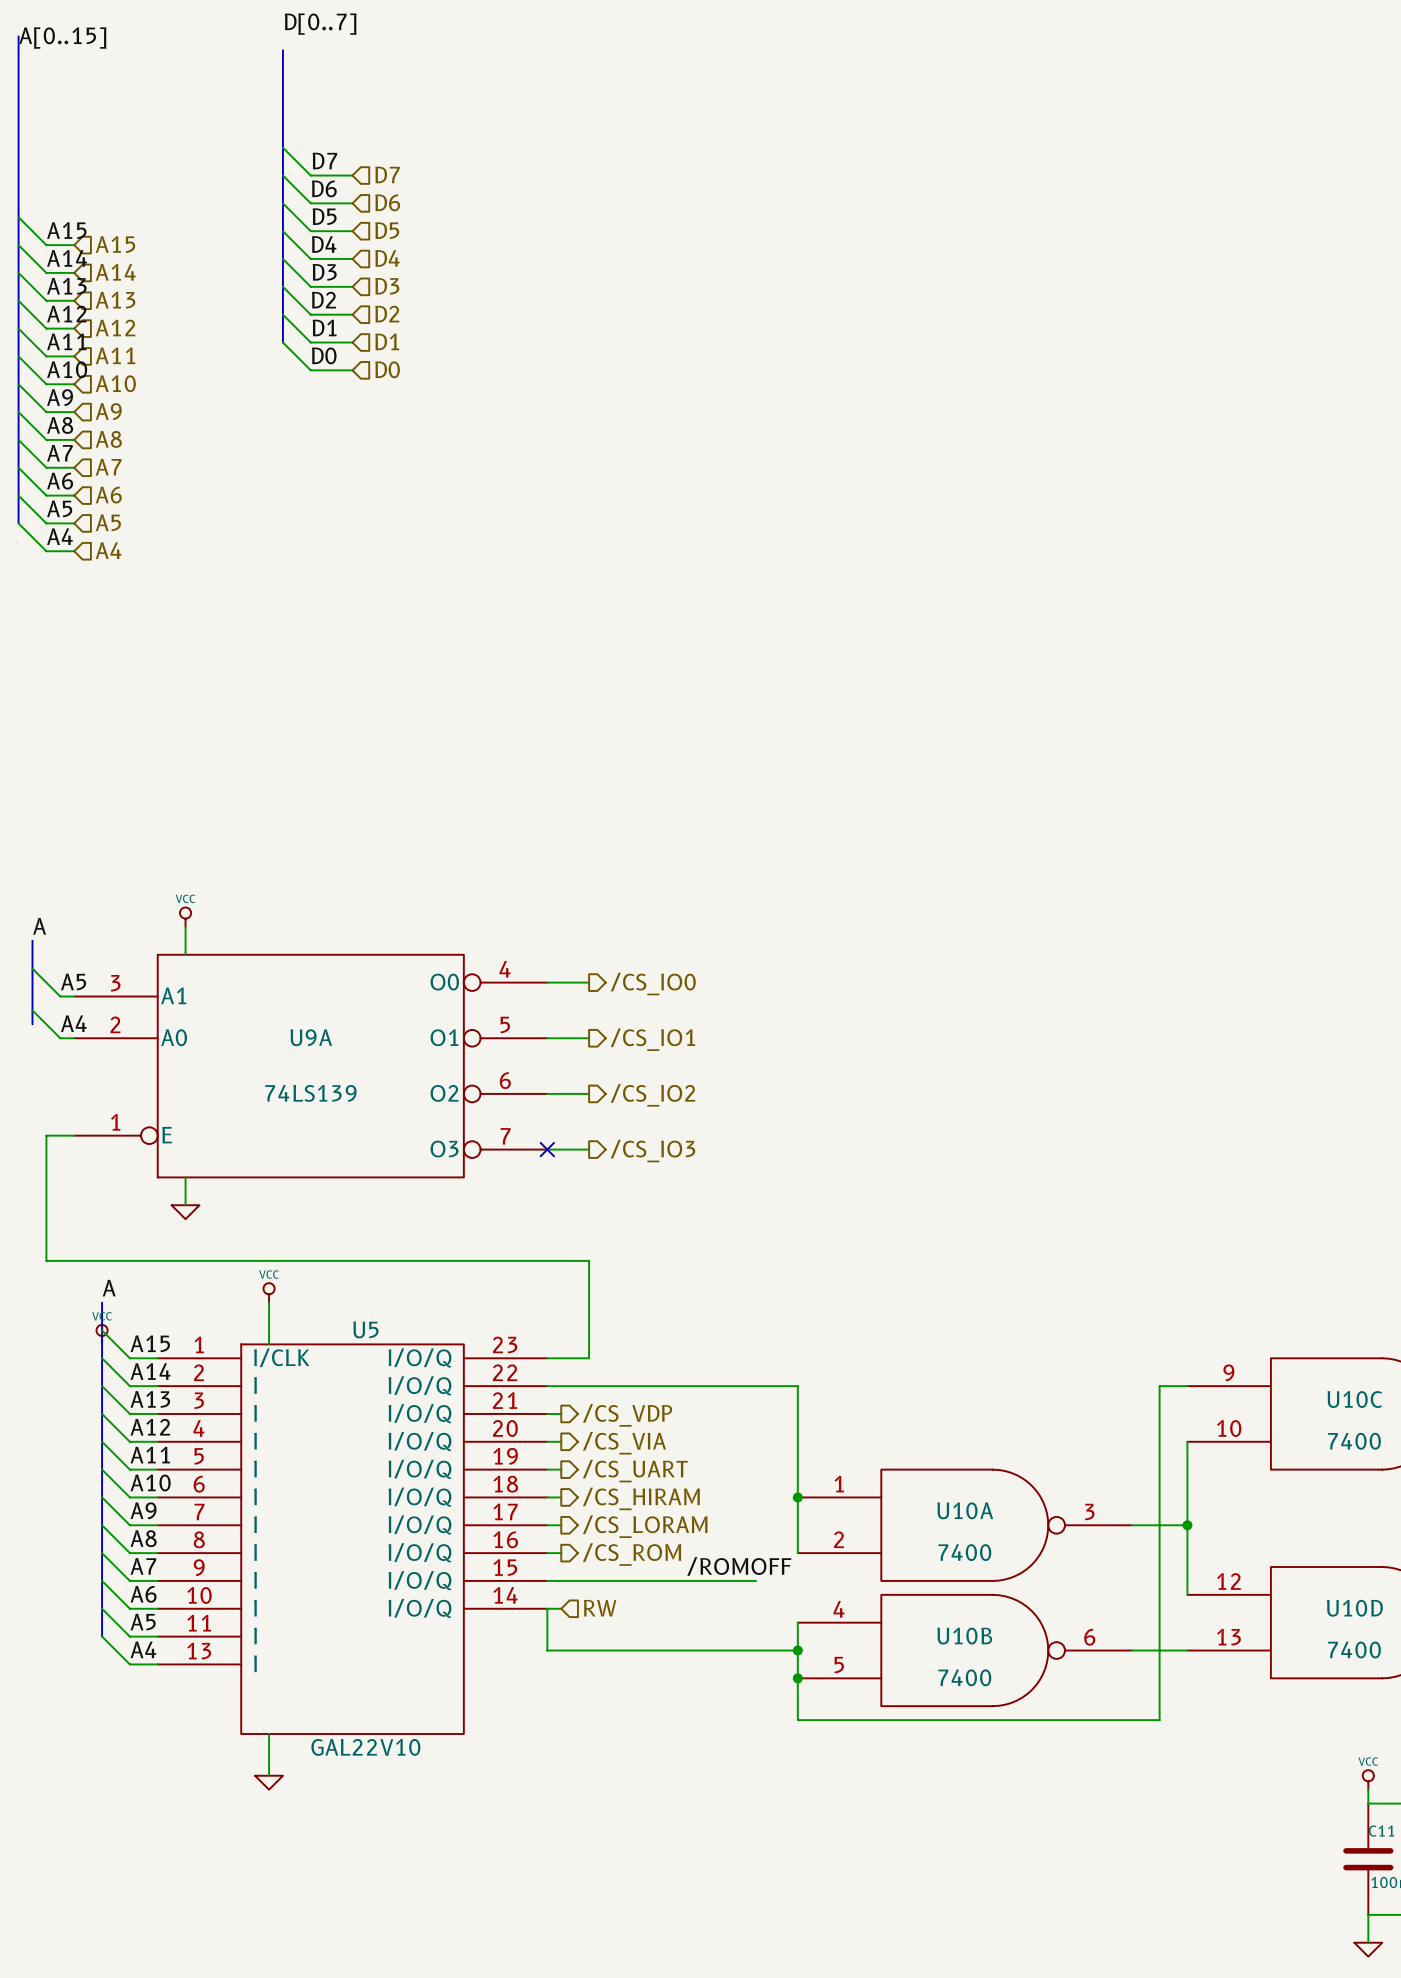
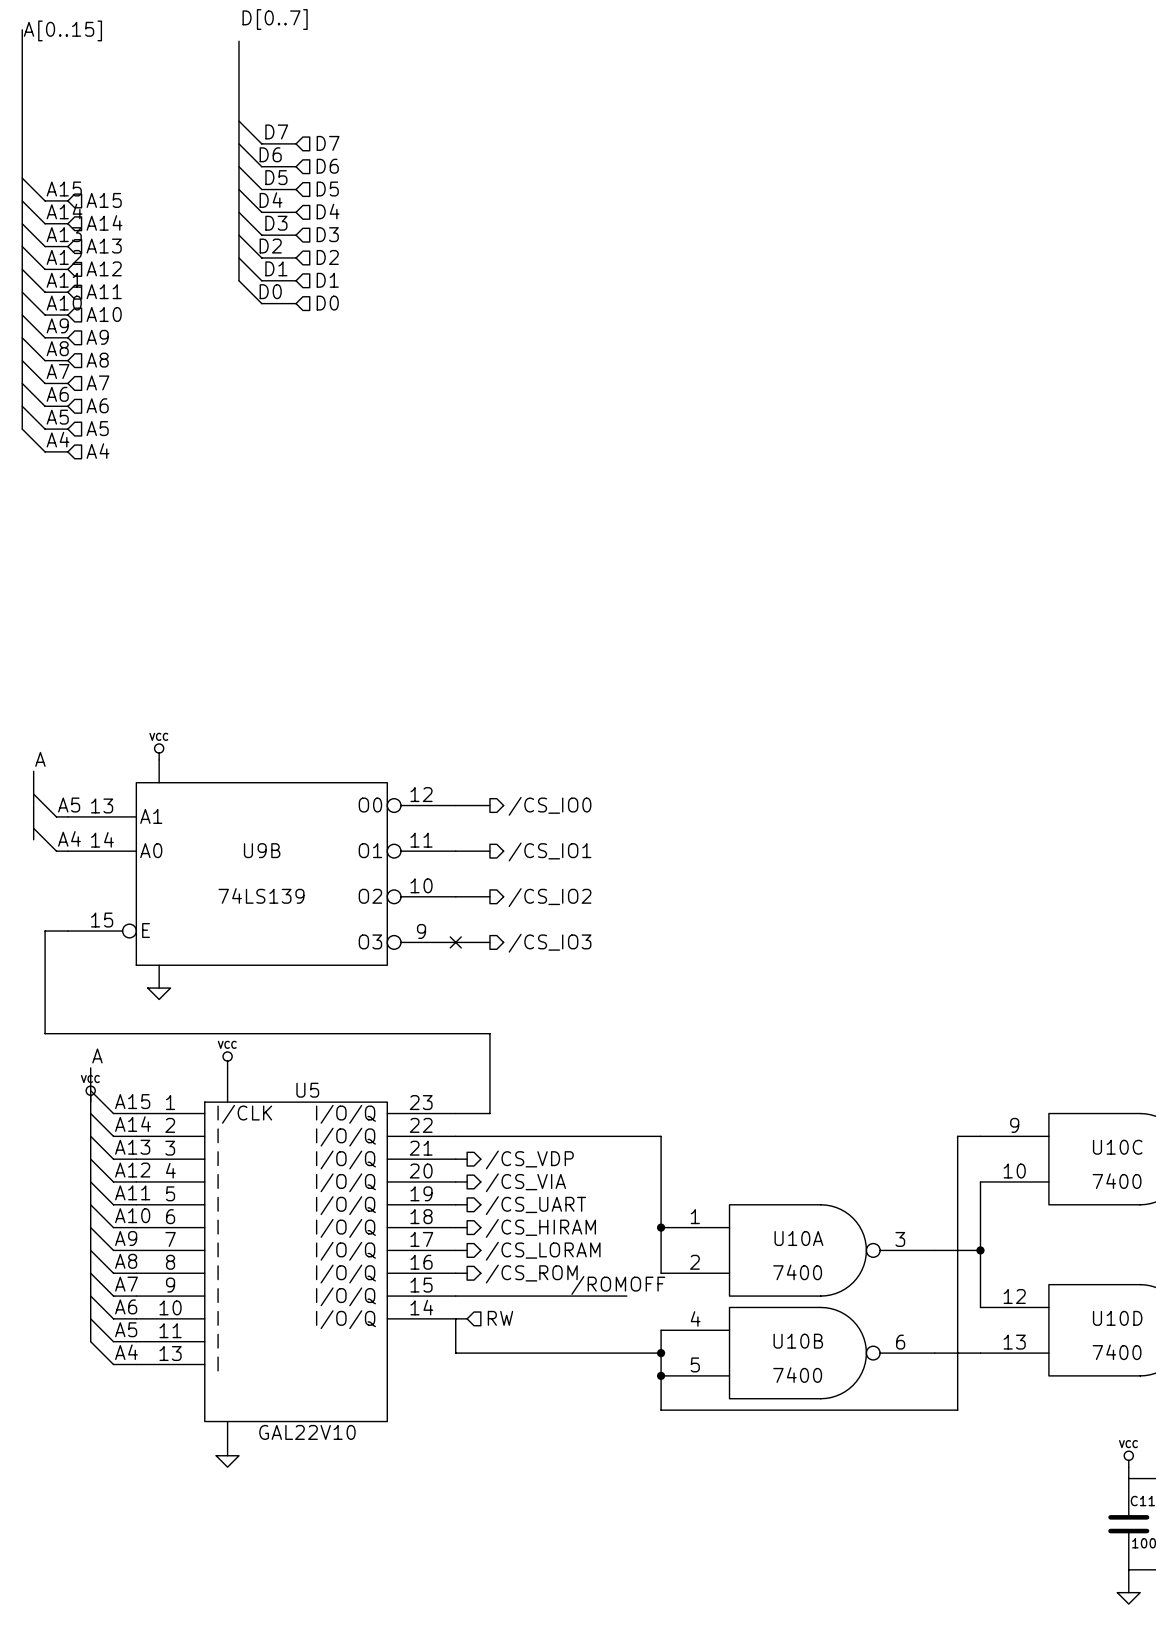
U9A pin number: 4 (505, 969) -> 12 (421, 794)
U9A pin number: 3 (115, 983) -> 13 (102, 805)
U9A pin number: 2 (115, 1024) -> 14 (102, 839)
U9A pin number: 5 (505, 1024) -> 11 (421, 840)
U9A name: U9A (311, 1037) -> U9B (262, 850)
U9A pin number: 6 (505, 1080) -> 10 (421, 885)
U9A pin number: 1 (115, 1122) -> 15 (102, 920)
U9A pin number: 7 (505, 1136) -> 9 (421, 931)

